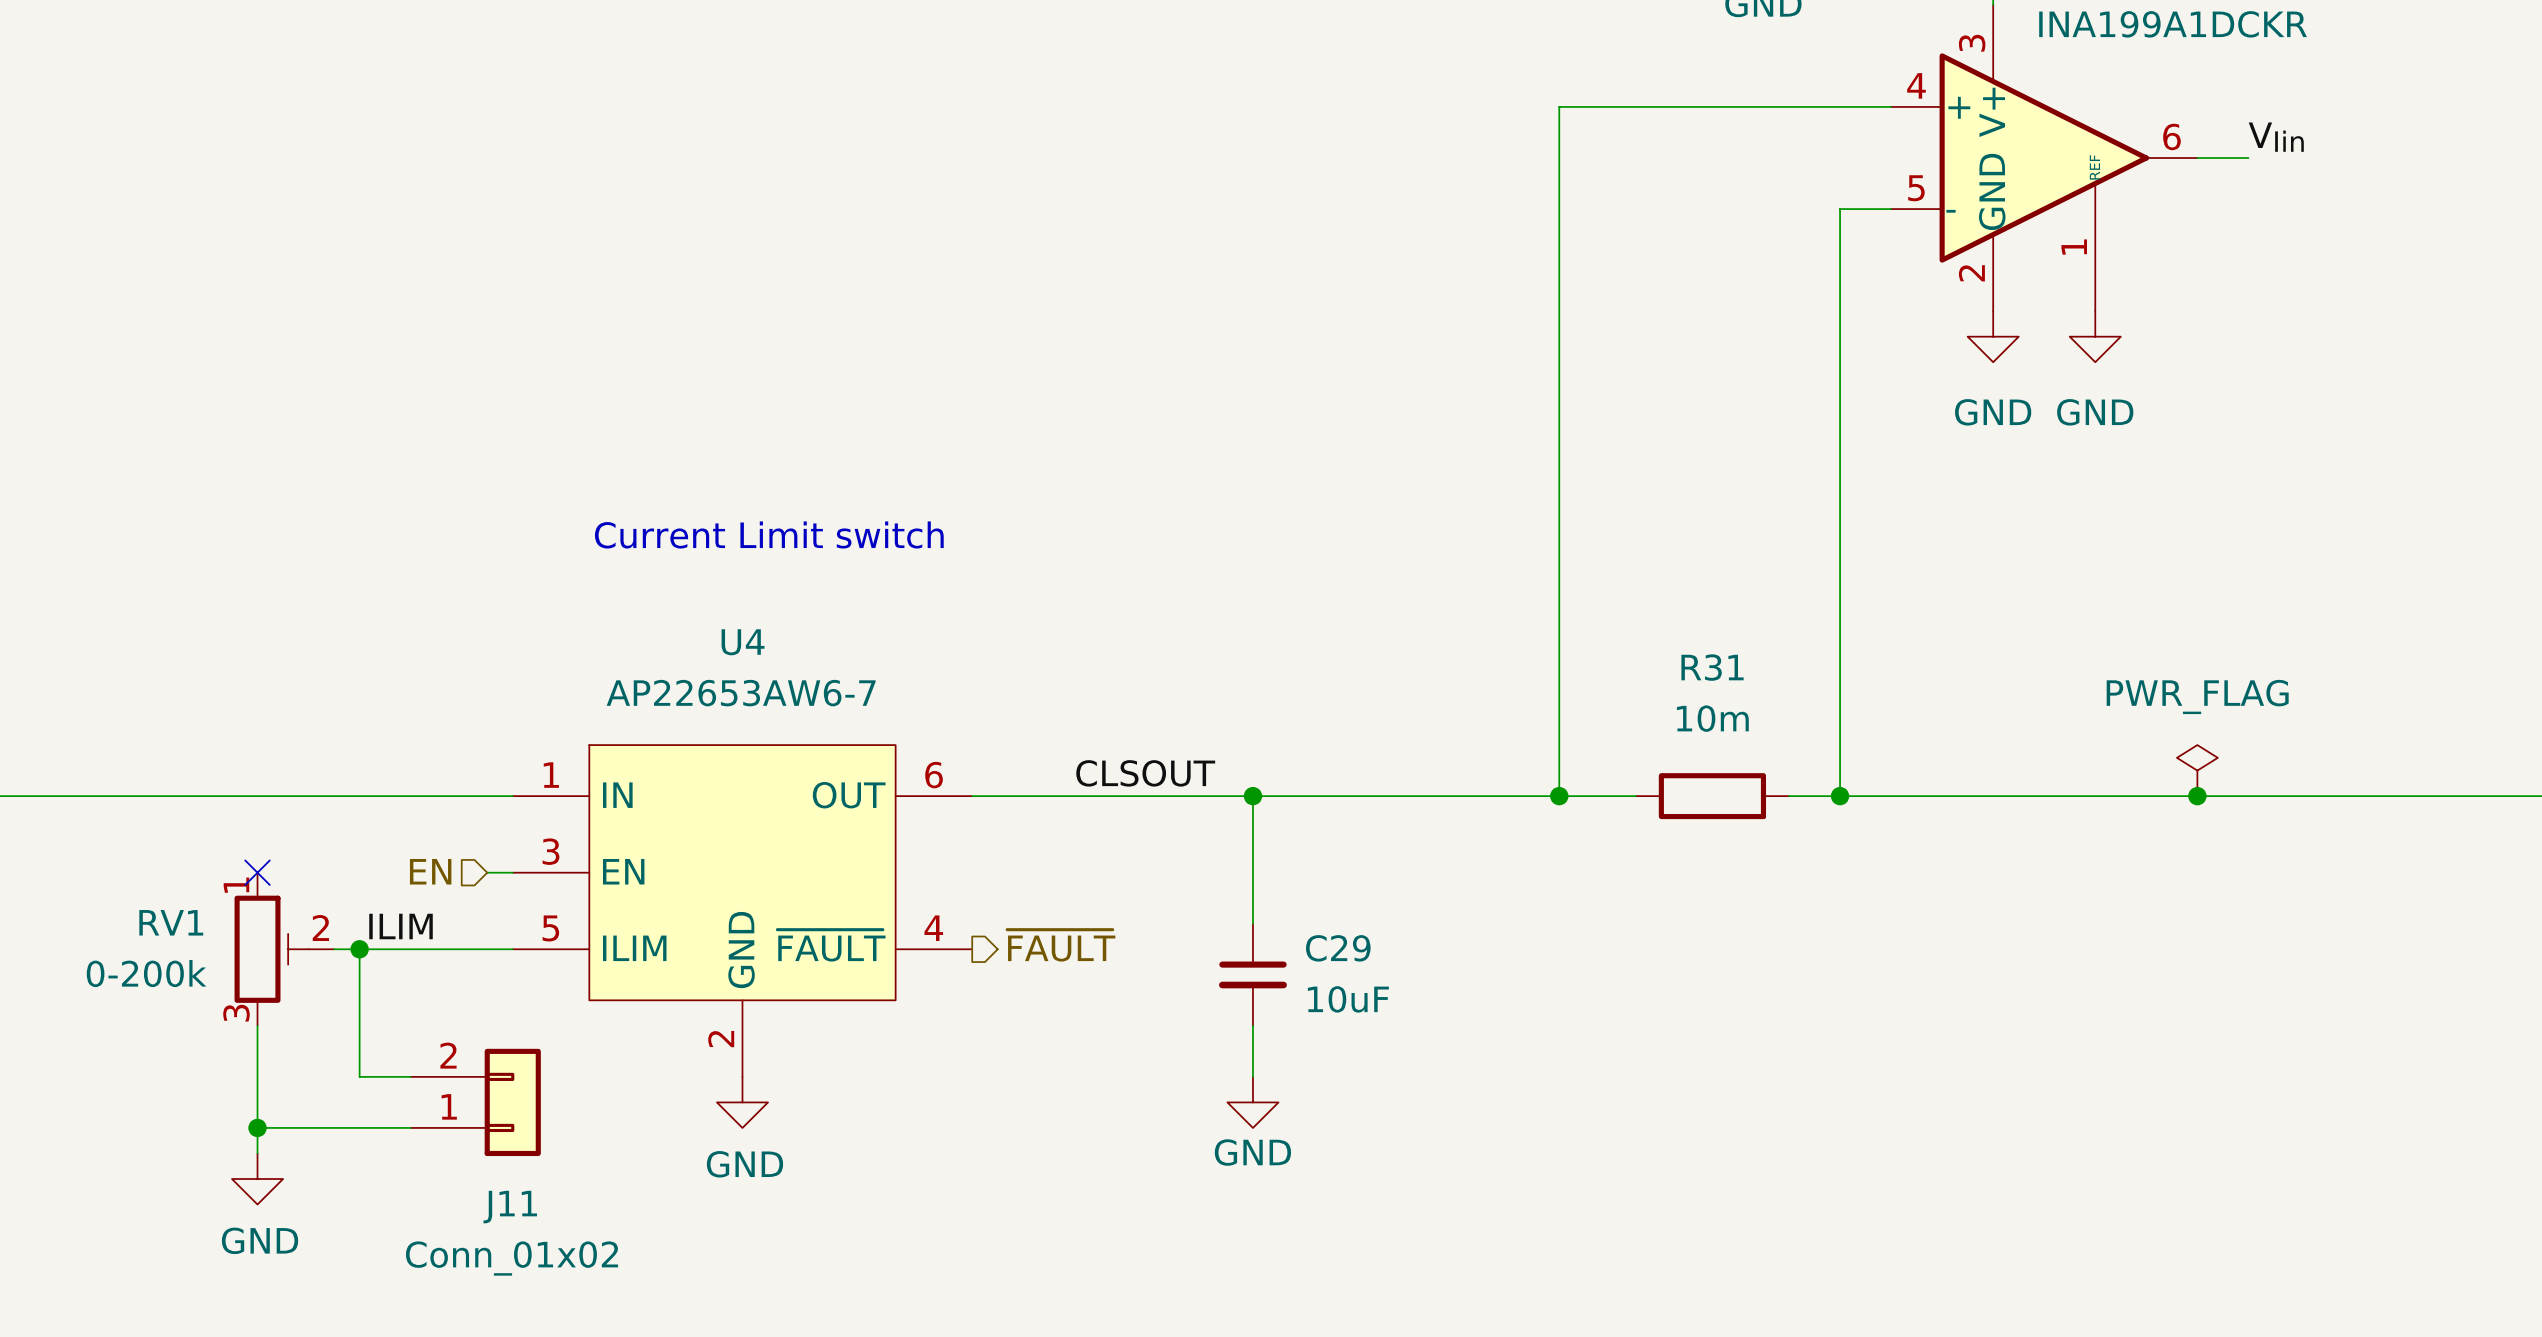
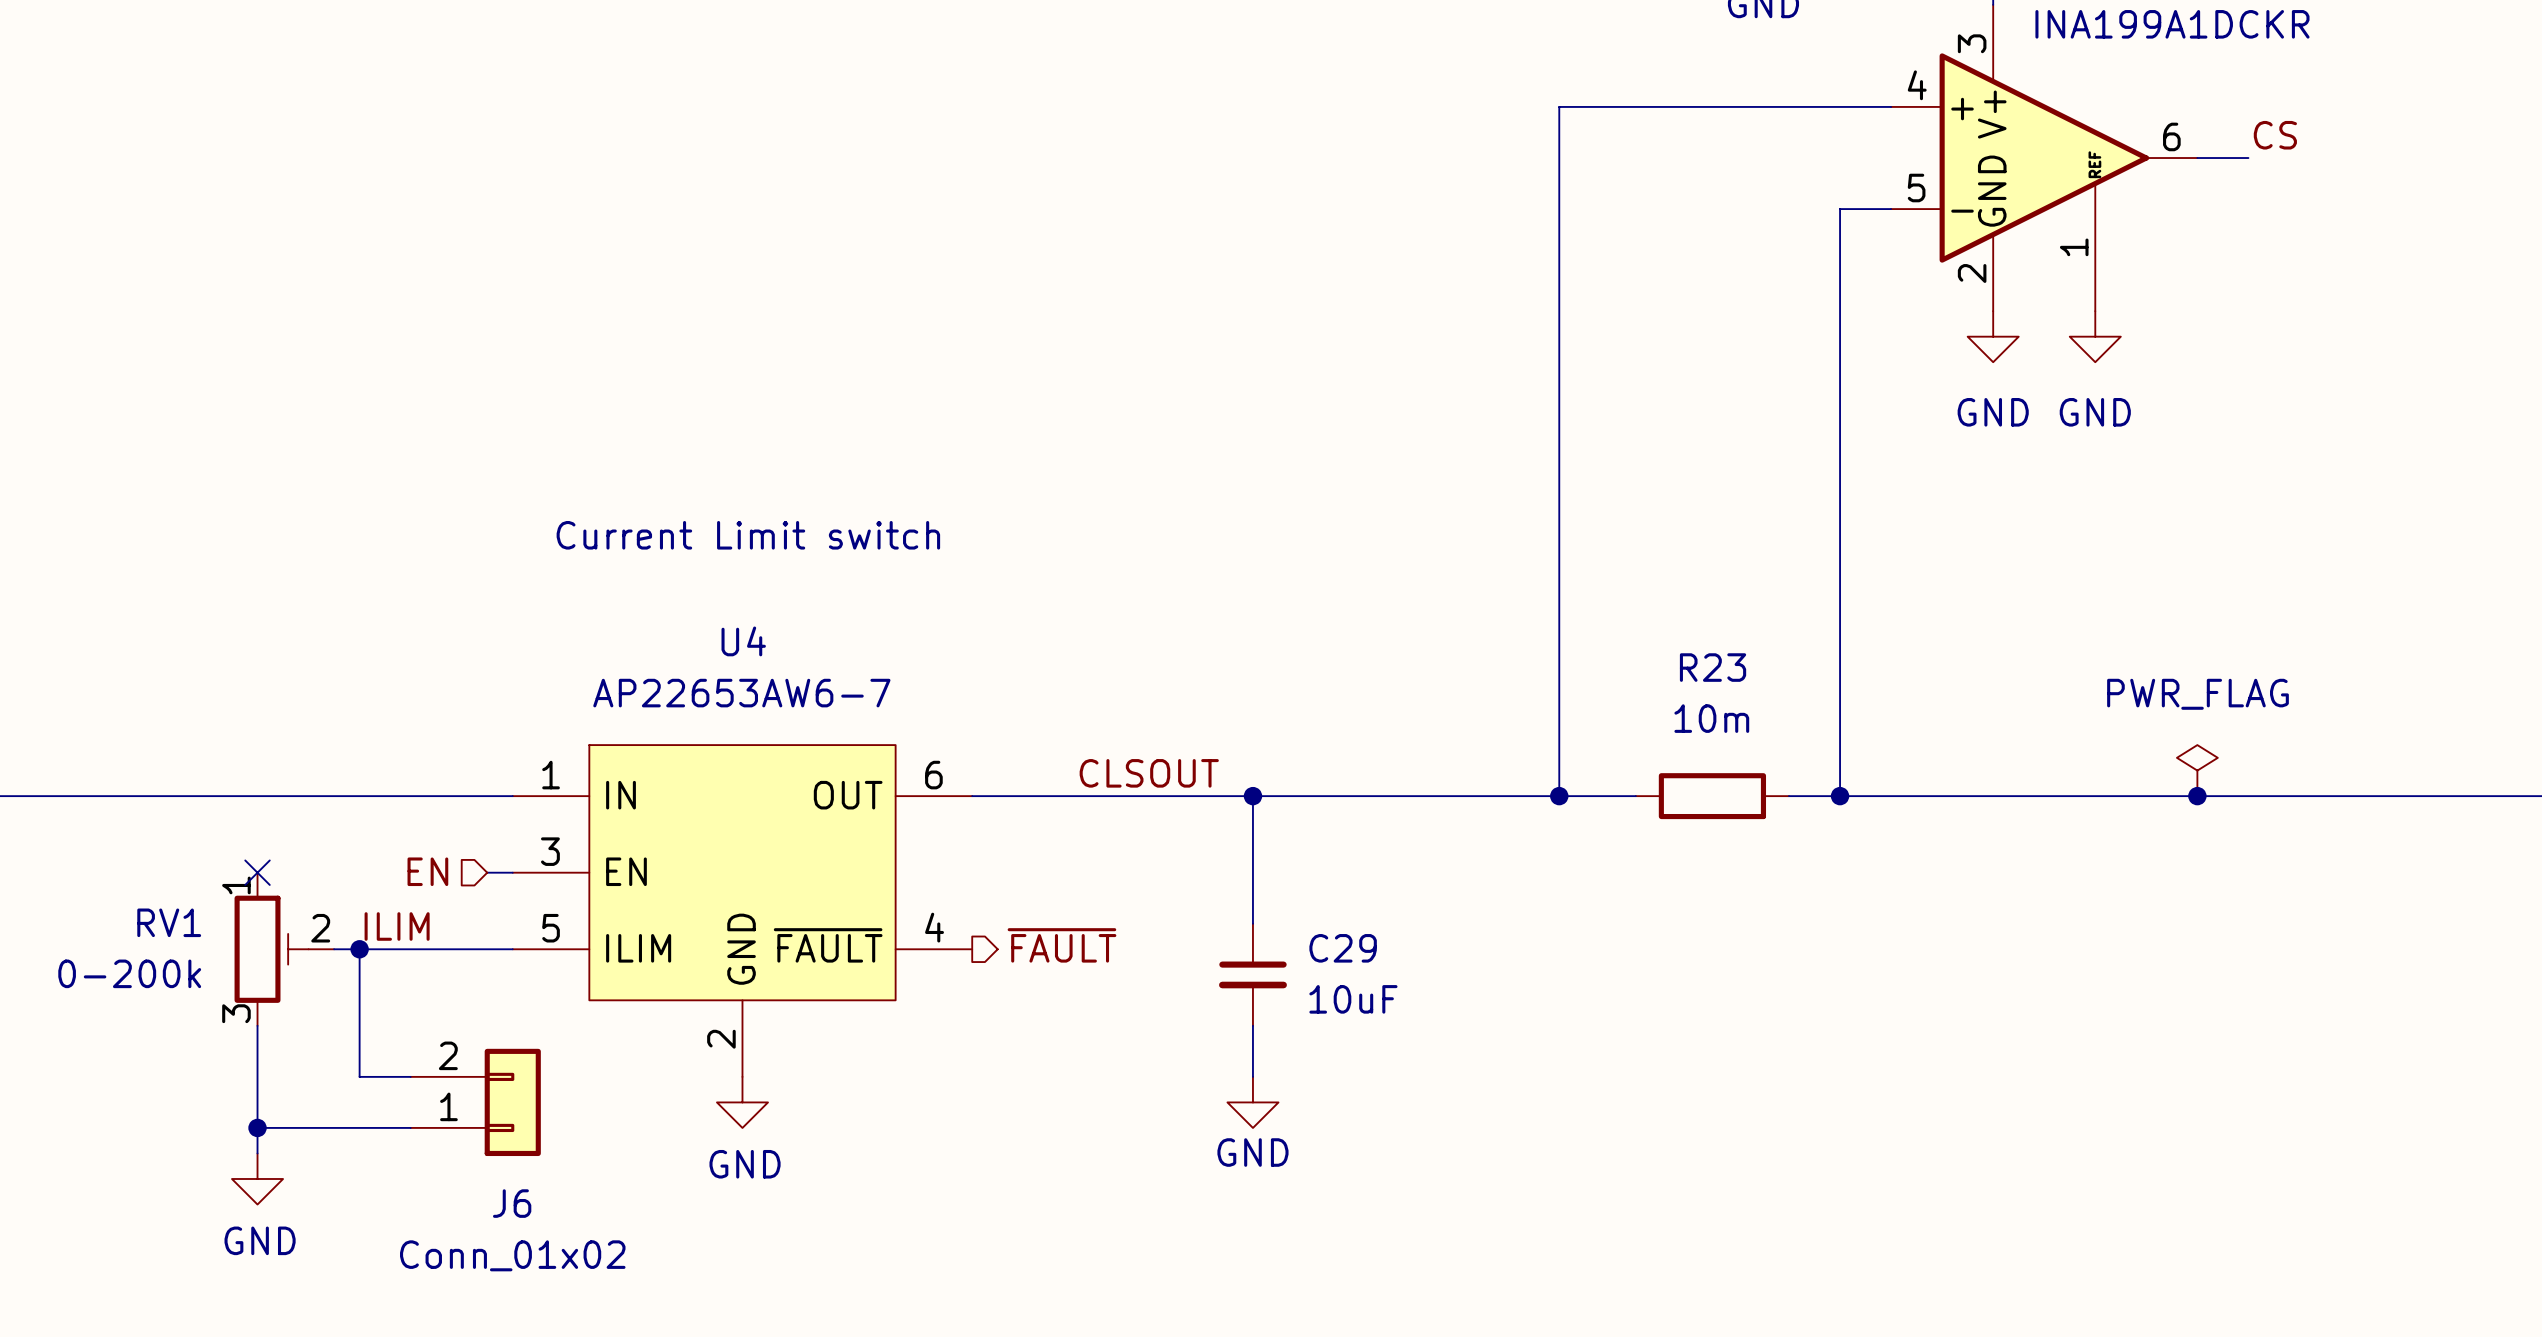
label: VIin (2276, 137) -> CS (2275, 135)
R31 name: R31 (1712, 667) -> R23 (1713, 667)
J11 name: J11 (510, 1207) -> J6 (512, 1203)

